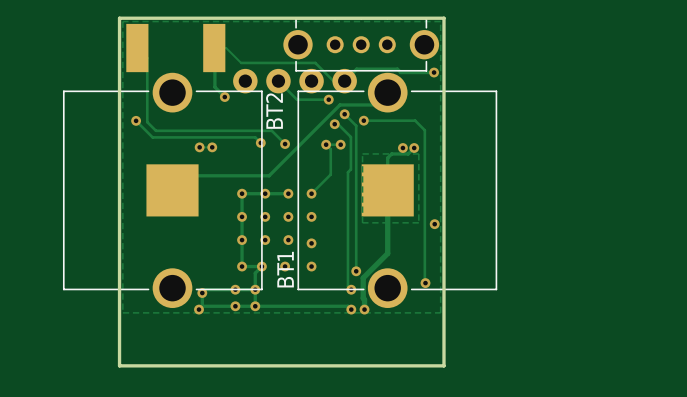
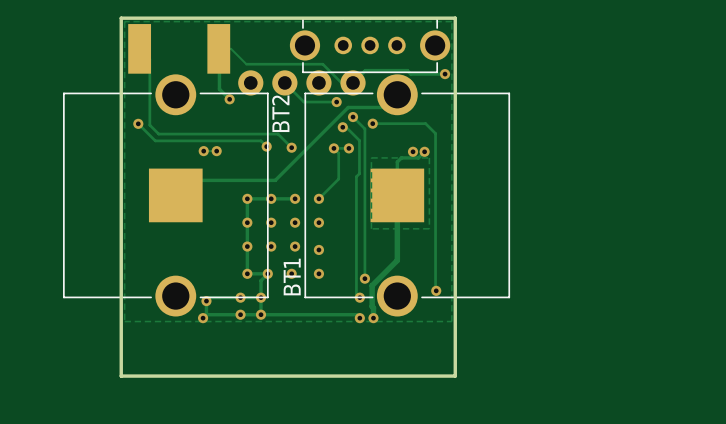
via: (434, 224) -> none

